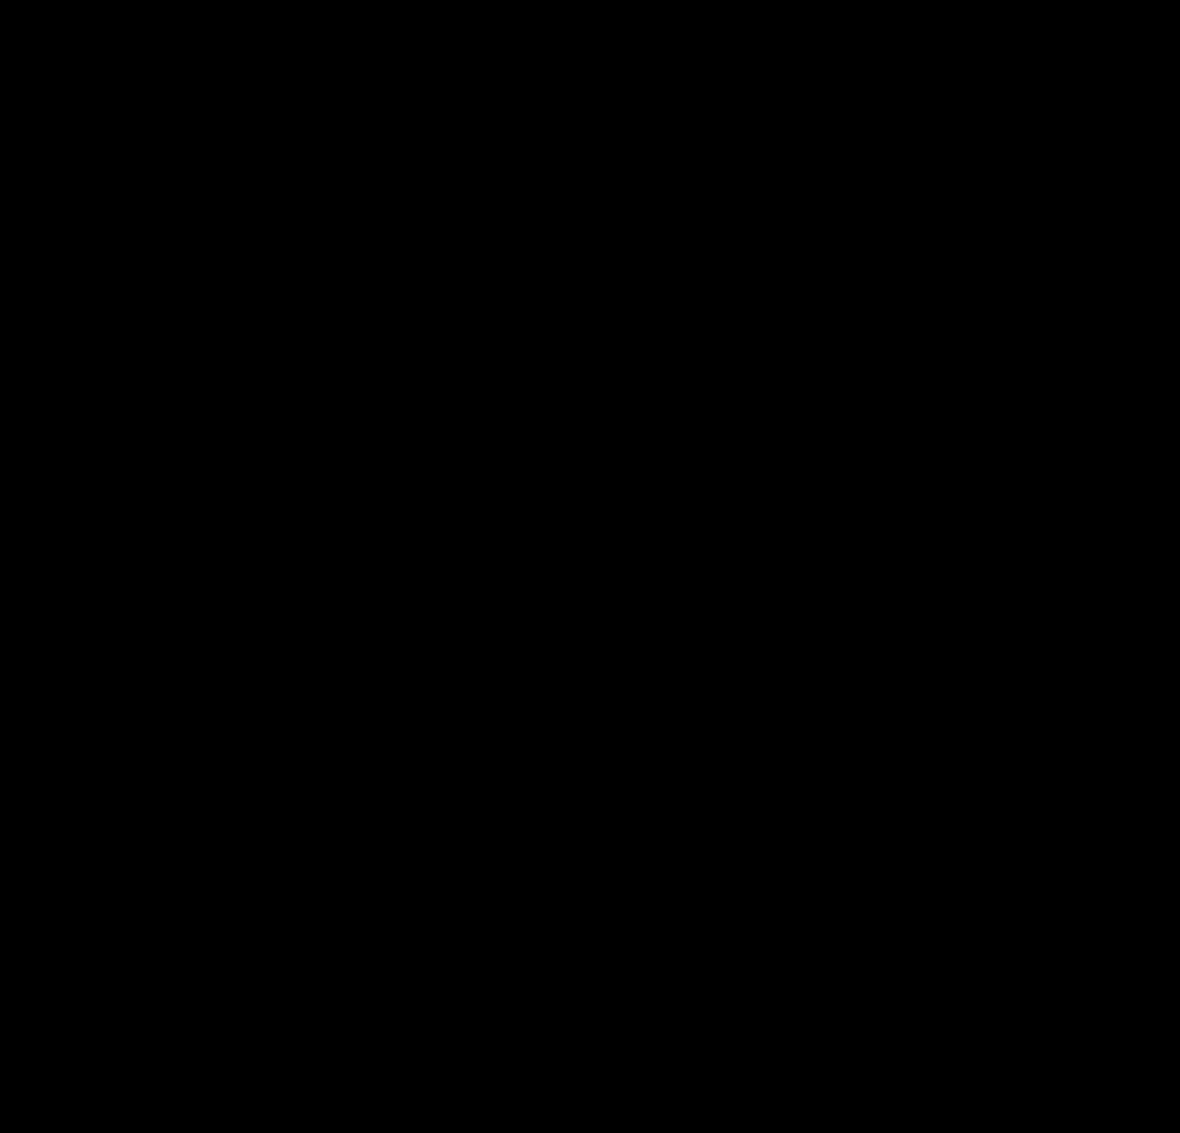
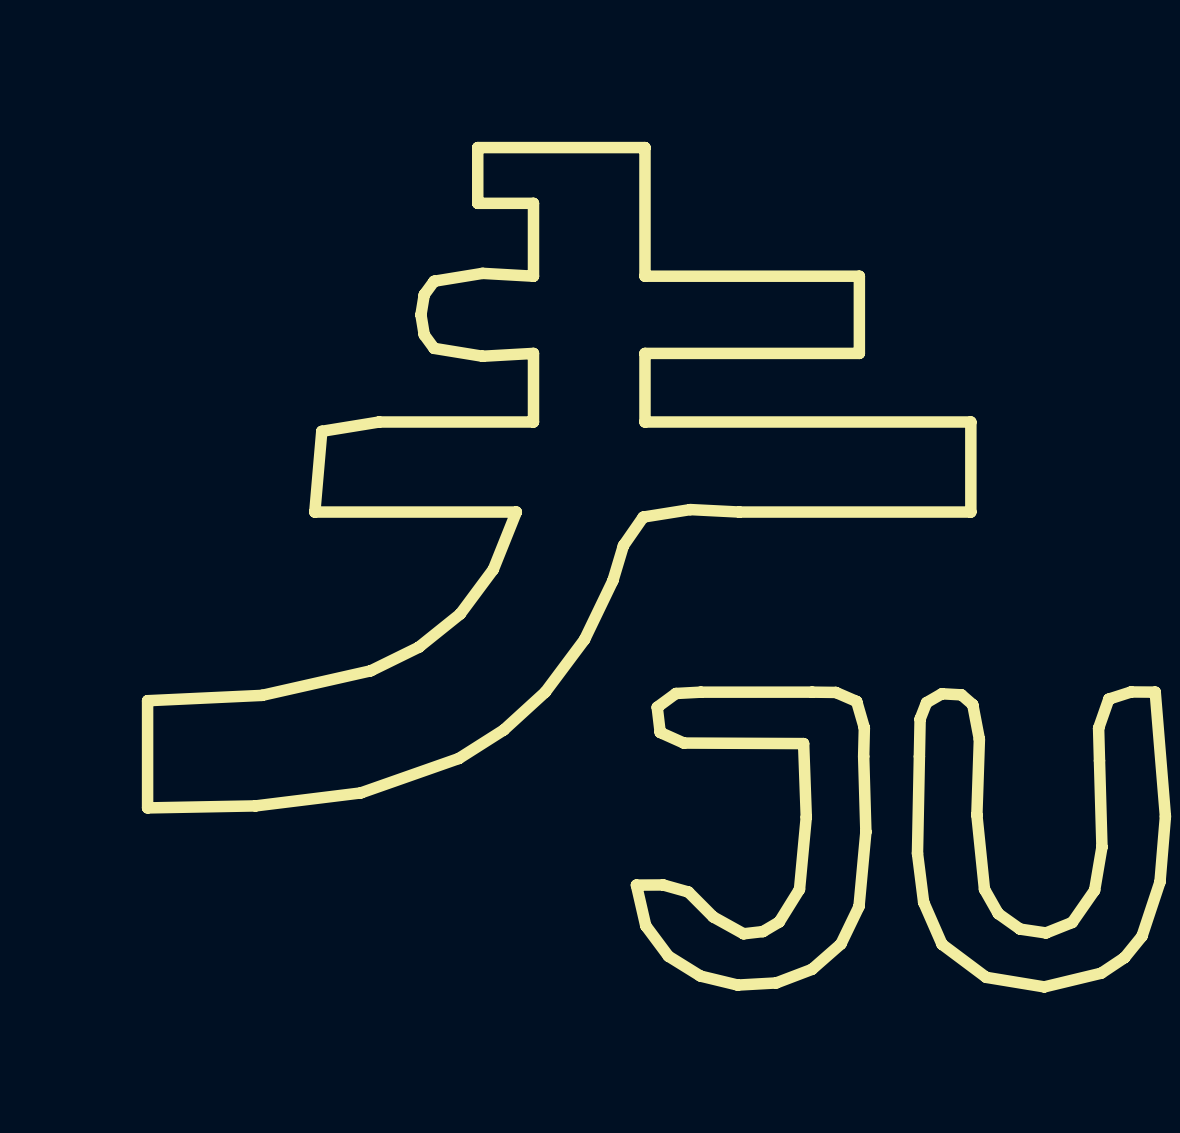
line: none -> (477, 147) (477, 203) (533, 203) (533, 276) (482, 273) (434, 281) (424, 294) (420, 314) (424, 334) (434, 348) (482, 356) (533, 353) (533, 422) (379, 422) (321, 431) (314, 512) (516, 512) (493, 569) (460, 613) (418, 647) (370, 670) (262, 695) (147, 700) (147, 807) (255, 805) (360, 792) (458, 758) (503, 729) (545, 692) (584, 639) (612, 580) (623, 545) (643, 517) (690, 509) (739, 512) (970, 512) (970, 422) (644, 422) (644, 353) (859, 353) (859, 276) (644, 276) (644, 147) (477, 147)
line: none -> (1131, 691) (1108, 699) (1098, 728) (1101, 847) (1094, 890) (1072, 922) (1046, 932) (1020, 929) (998, 913) (984, 889) (976, 814) (979, 739) (972, 704) (961, 694) (941, 693) (926, 702) (920, 719) (917, 853) (923, 902) (942, 944) (986, 977) (1044, 986) (1101, 973) (1124, 957) (1141, 936) (1159, 881) (1165, 816) (1155, 692) (1131, 691)
line: none -> (700, 692) (675, 693) (657, 707) (660, 732) (683, 743) (803, 743) (806, 817) (799, 889) (779, 921) (762, 931) (743, 933) (713, 916) (688, 892) (663, 884) (636, 885) (645, 925) (668, 956) (700, 976) (737, 985) (776, 982) (812, 969) (840, 943) (859, 906) (865, 831) (864, 727) (856, 701) (835, 692) (700, 692)

